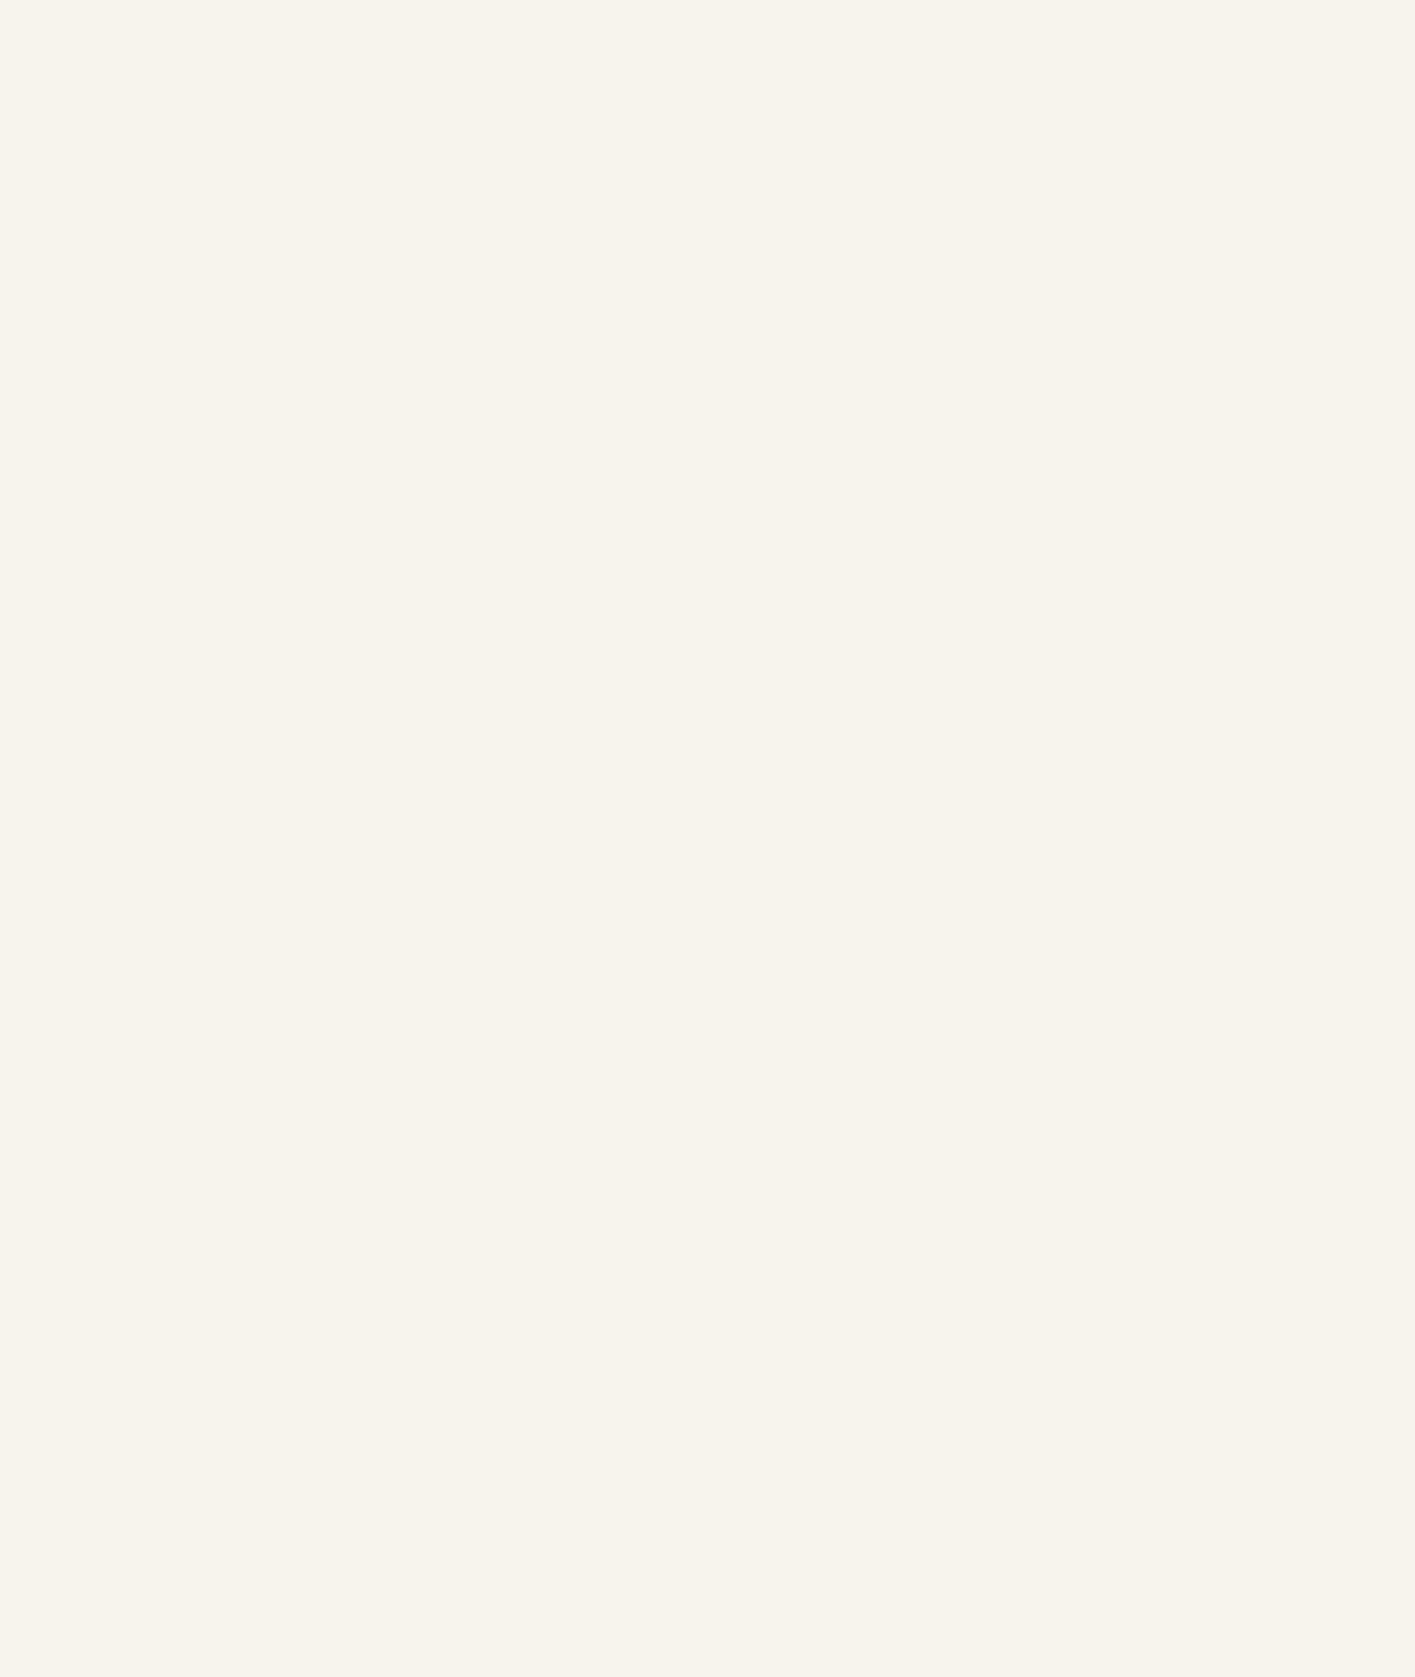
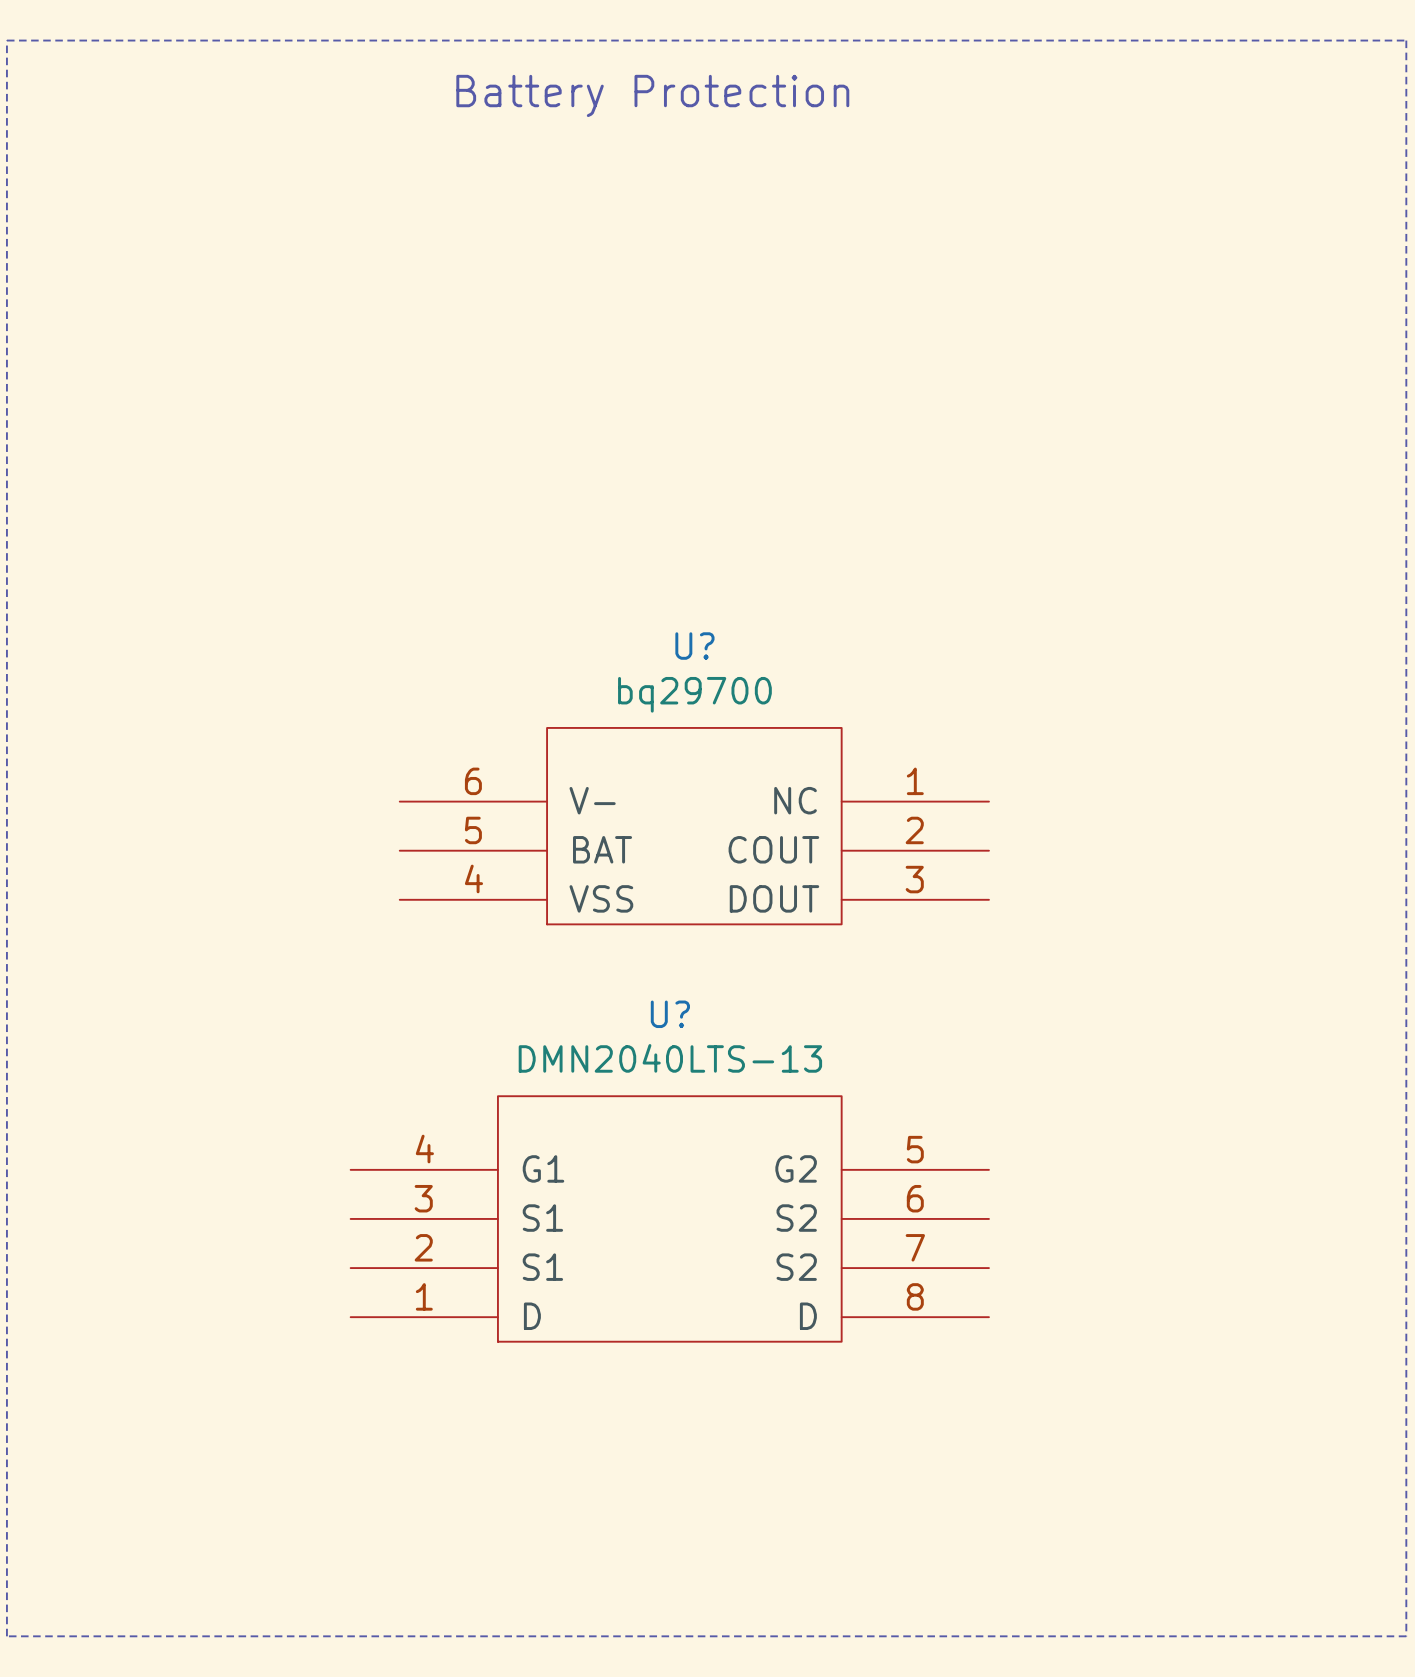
line: none -> (6, 40) (1406, 40) (1406, 1636) (6, 1636) (6, 40)
text: none -> Battery Protection (652, 95)
U?: none -> bq29700 (694, 826)
U?: none -> DMN2040LTS-13 (669, 1218)

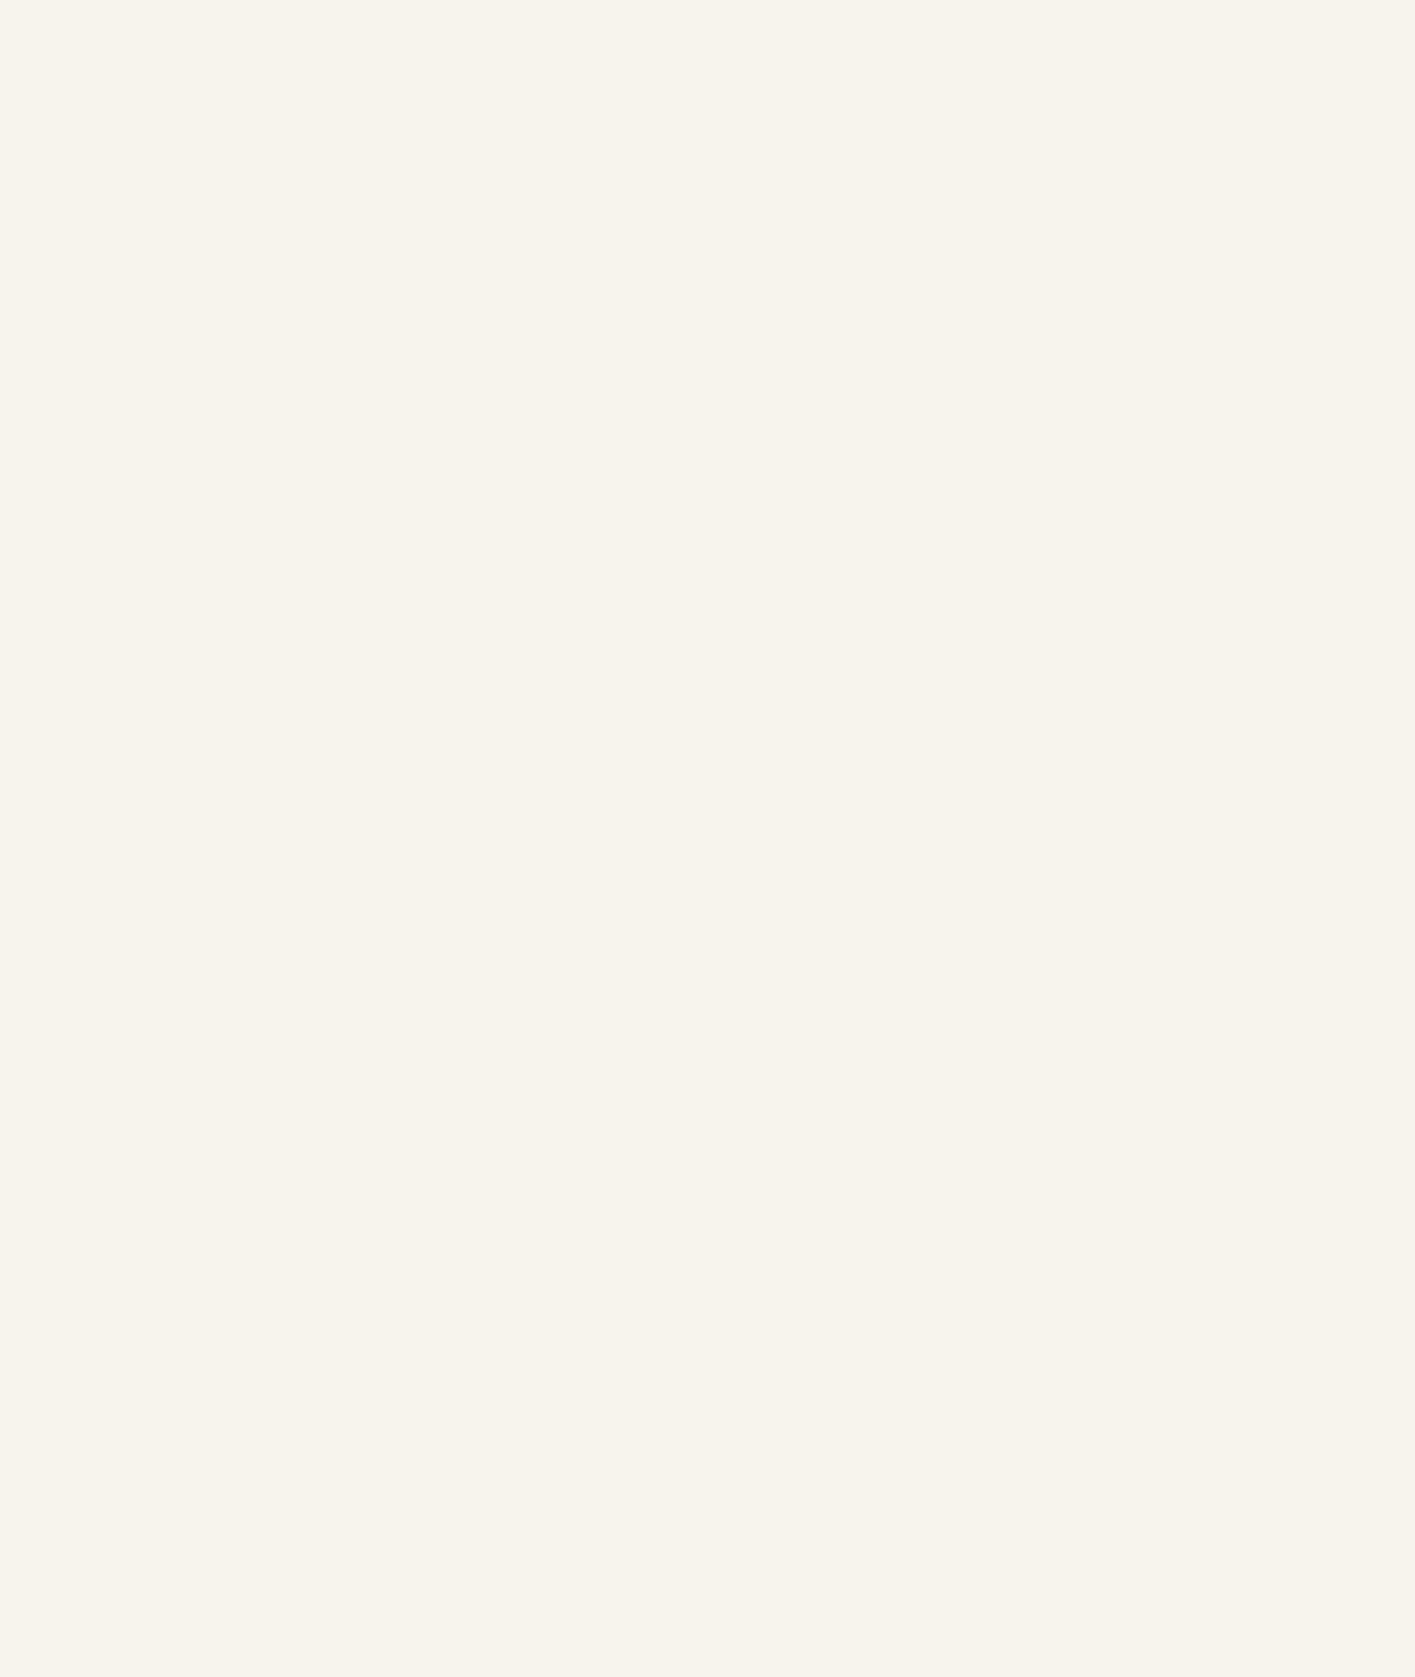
line: (6, 40) (1406, 40) (1406, 1636) (6, 1636) (6, 40) -> none
text: Battery Protection (652, 95) -> none
U?: bq29700 (694, 826) -> none
U?: DMN2040LTS-13 (669, 1218) -> none

